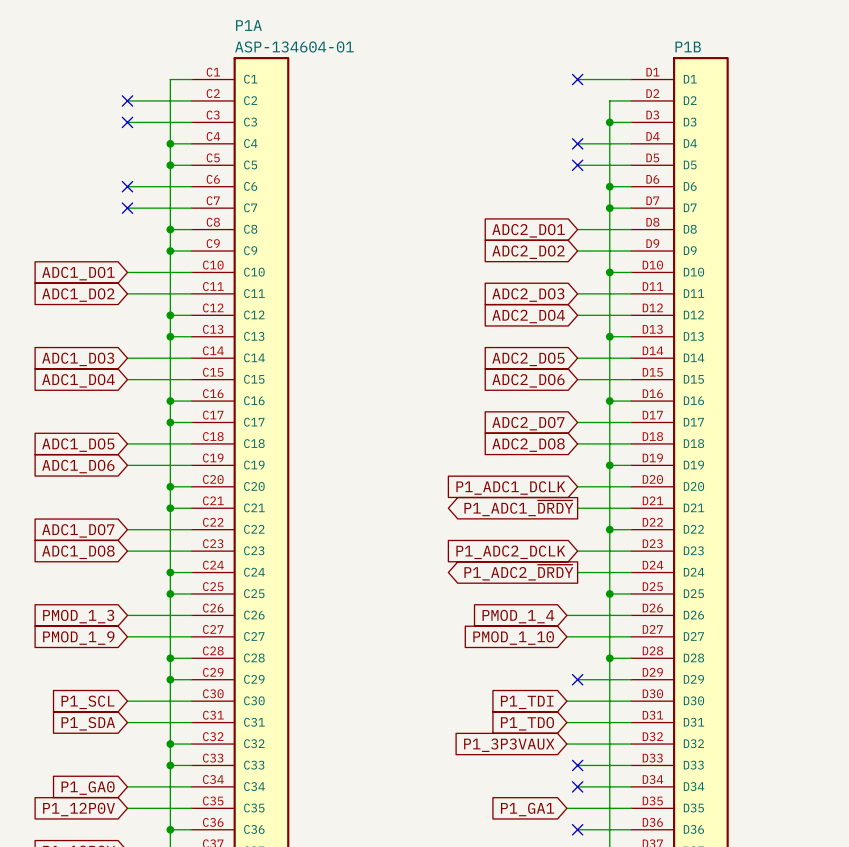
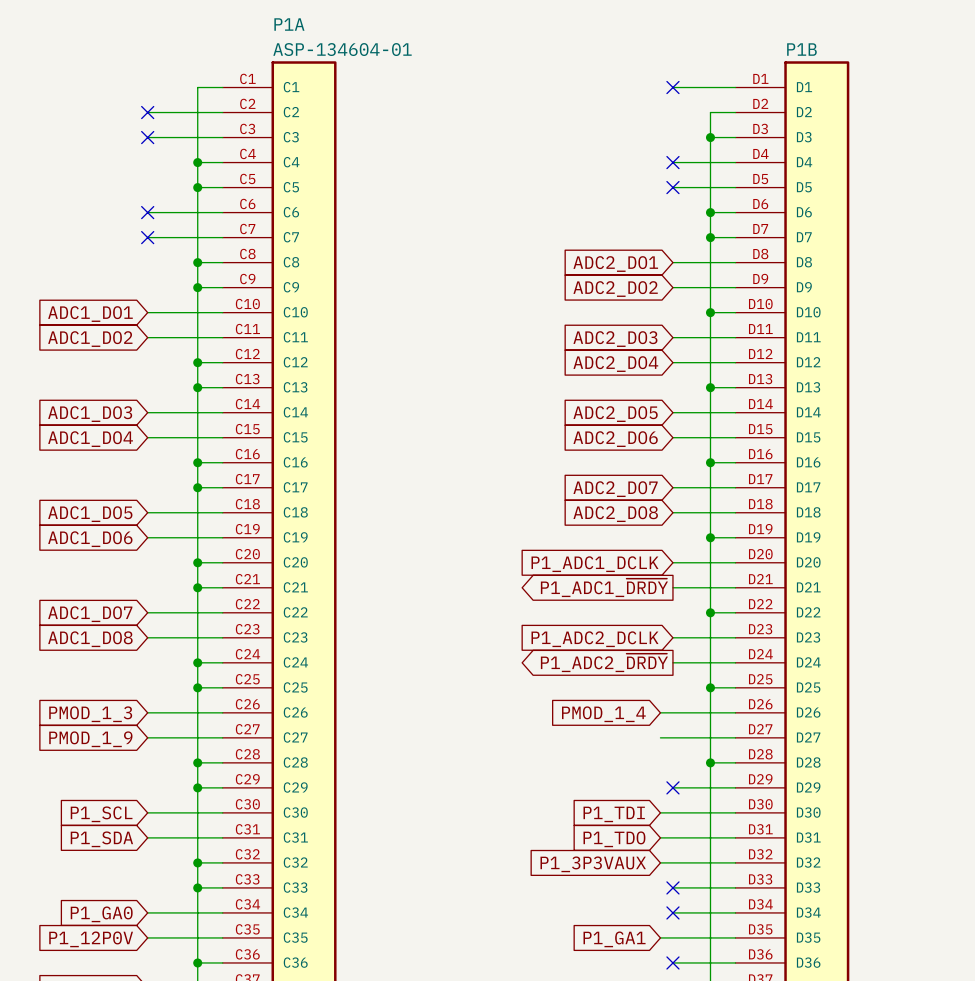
global label: PMOD_1_10 (513, 638) -> none

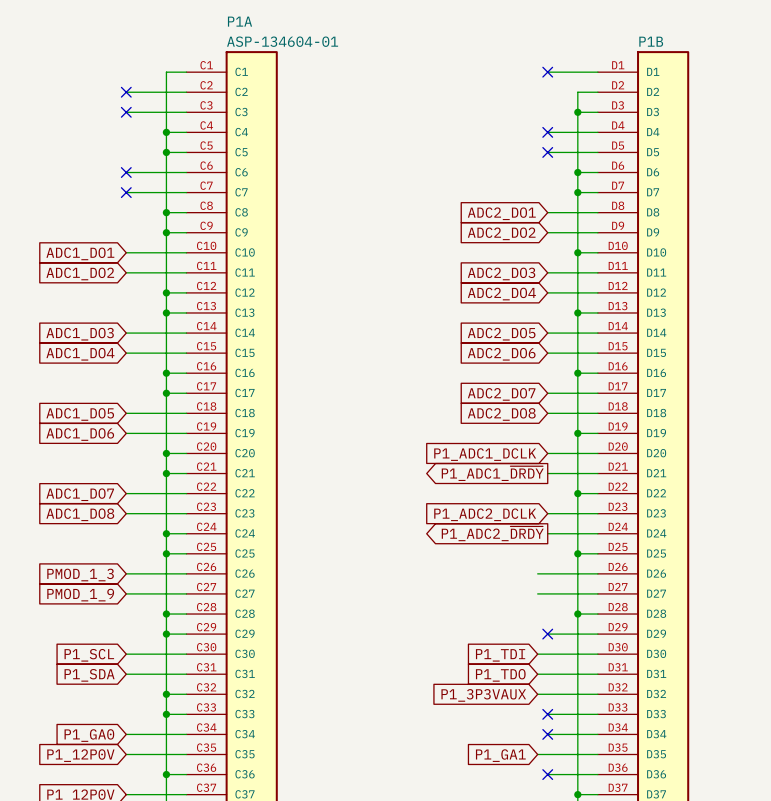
global label: PMOD_1_4 (603, 714) -> none

